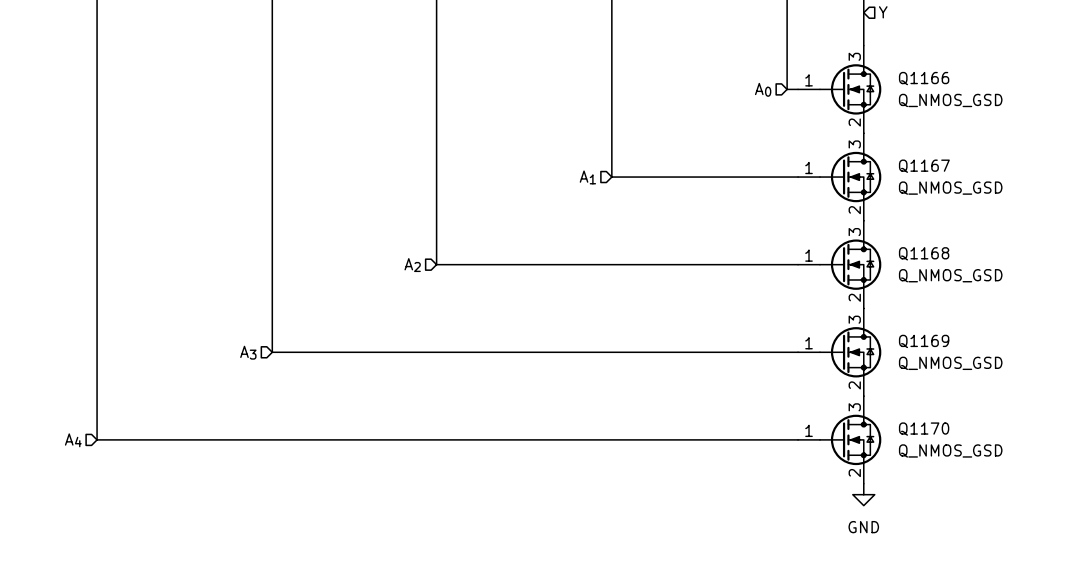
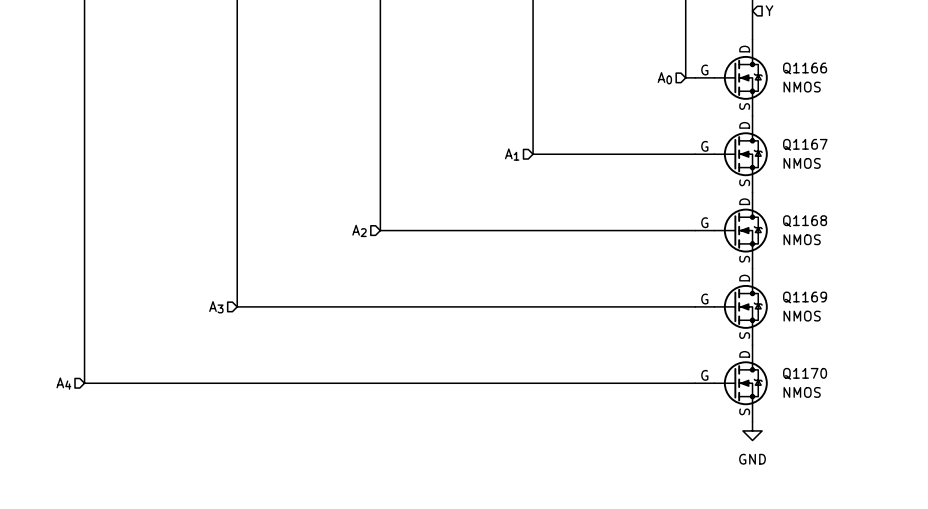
Q1166 symbol: [798, 45, 882, 134] -> [695, 39, 768, 117]
Q1166 value: Q_NMOS_GSD (950, 100) -> NMOS (802, 87)
Q1167 symbol: [798, 133, 882, 221] -> [695, 116, 768, 193]
Q1167 value: Q_NMOS_GSD (950, 188) -> NMOS (802, 163)
Q1168 symbol: [798, 220, 882, 309] -> [695, 192, 768, 269]
Q1168 value: Q_NMOS_GSD (950, 275) -> NMOS (802, 239)
Q1169 symbol: [798, 308, 882, 397] -> [695, 268, 768, 346]
Q1169 value: Q_NMOS_GSD (950, 363) -> NMOS (802, 316)
Q1170 symbol: [798, 396, 882, 484] -> [695, 345, 768, 422]
Q1170 value: Q_NMOS_GSD (950, 450) -> NMOS (802, 392)

